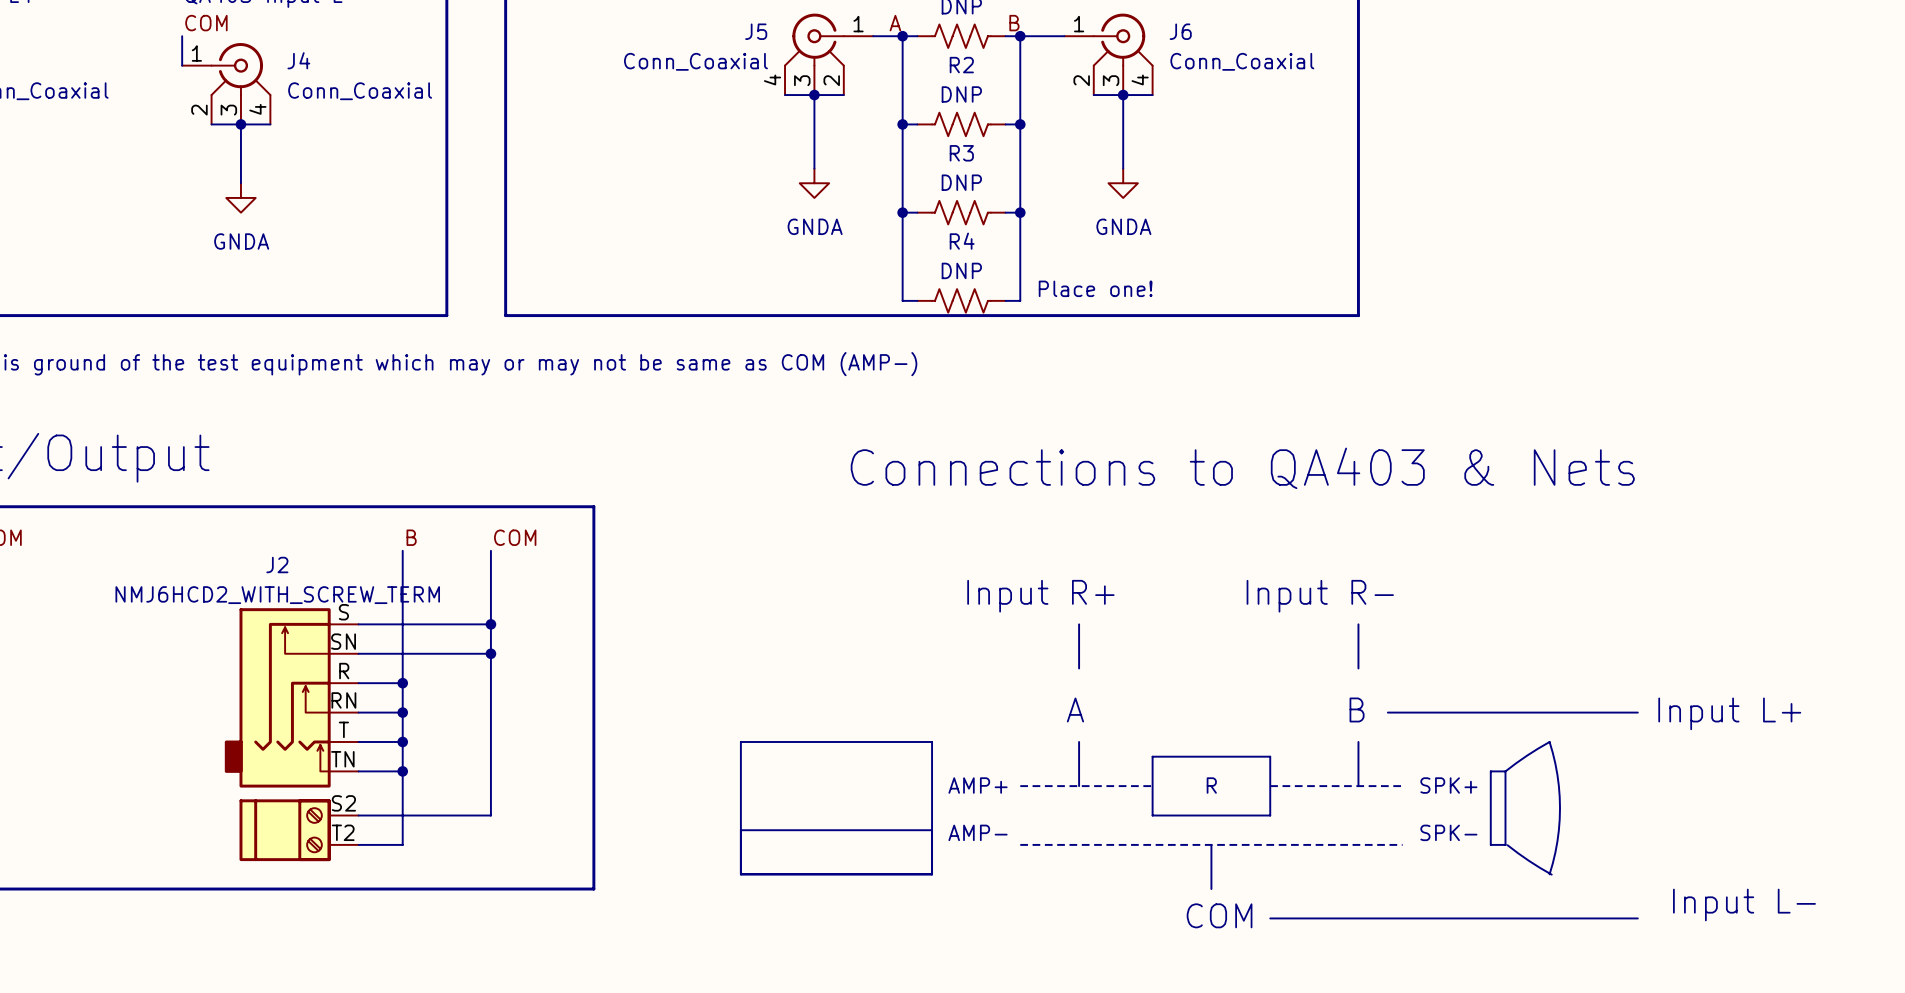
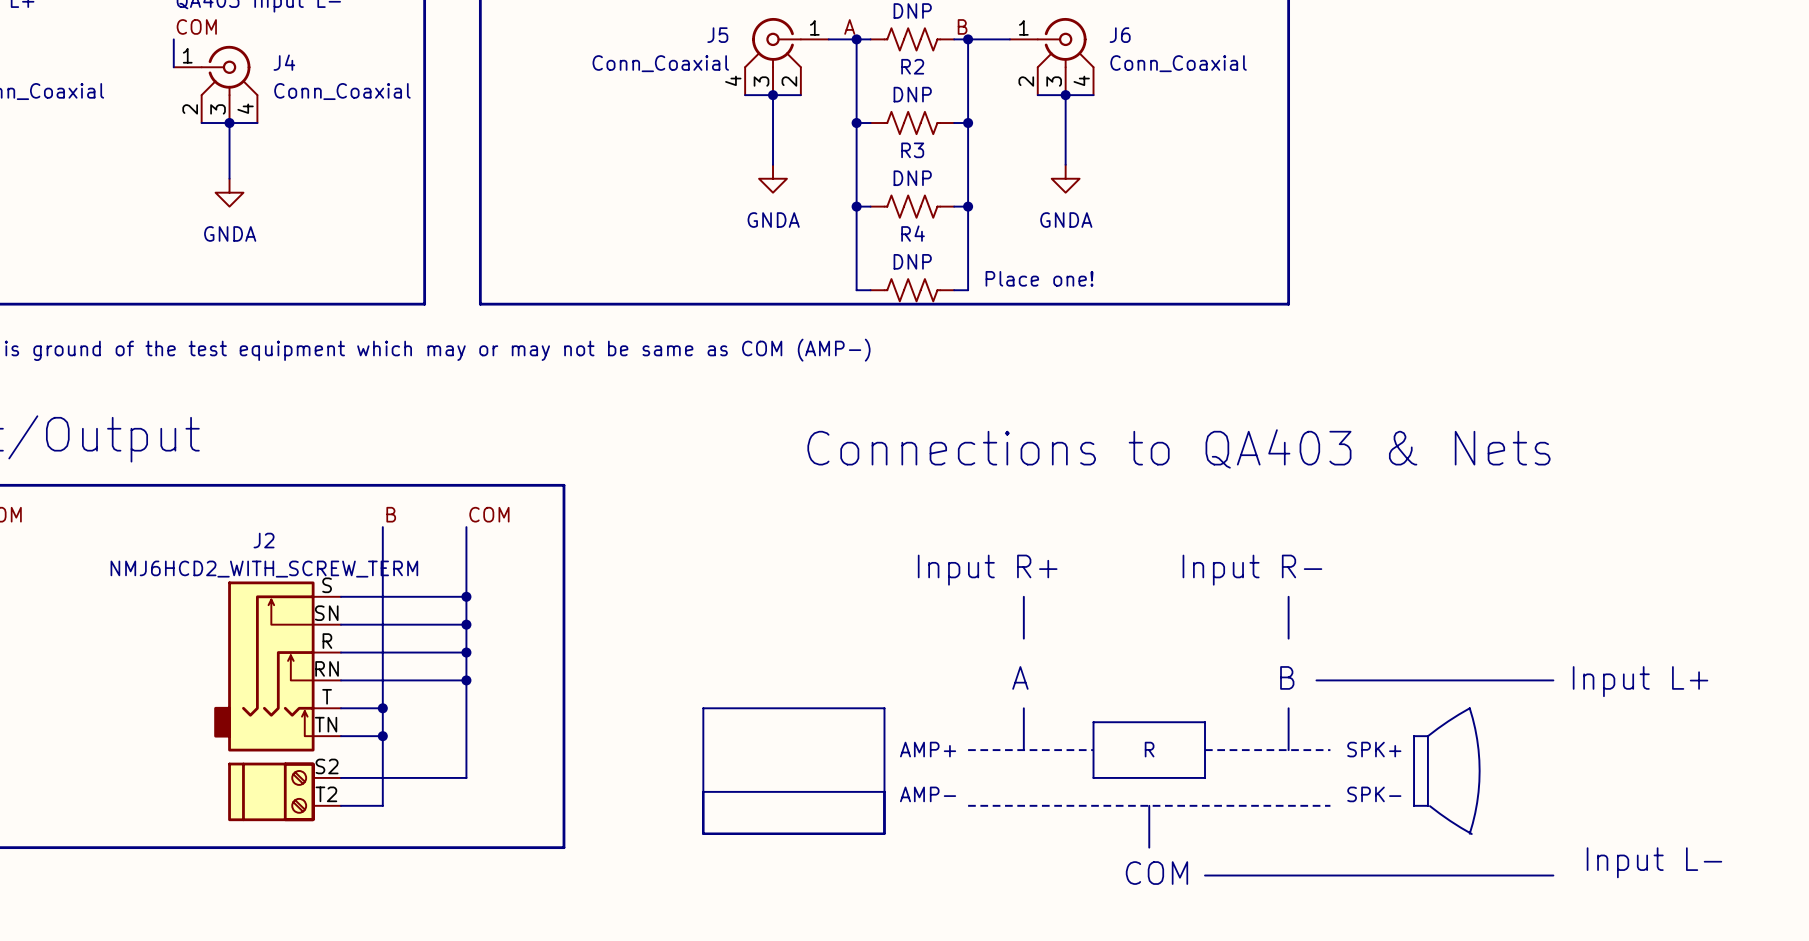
wire: none -> (382, 652) (466, 652)
junction: (402, 683) -> none
junction: none -> (466, 652)
wire: none -> (382, 680) (466, 680)
junction: (402, 712) -> none
junction: none -> (466, 680)

